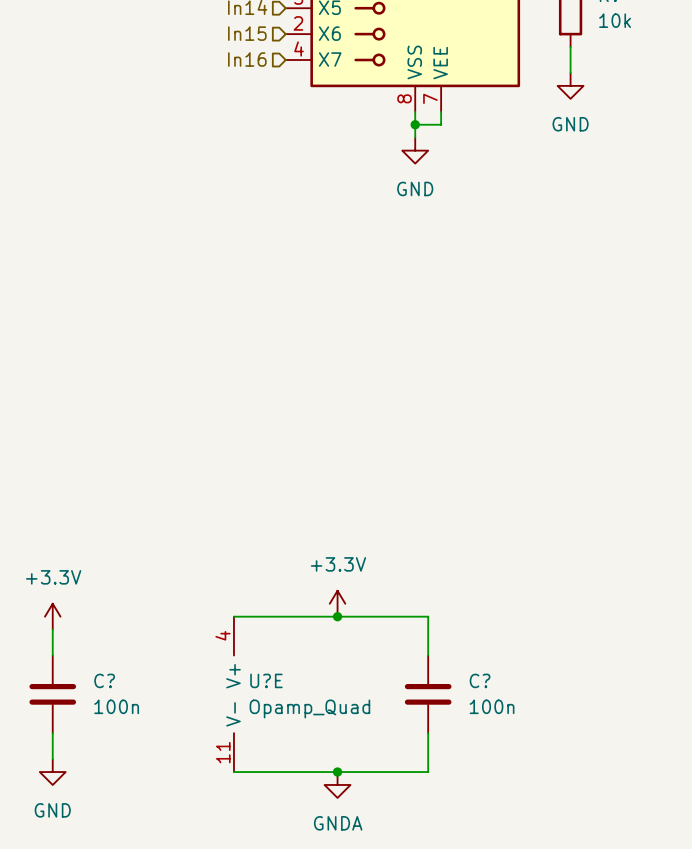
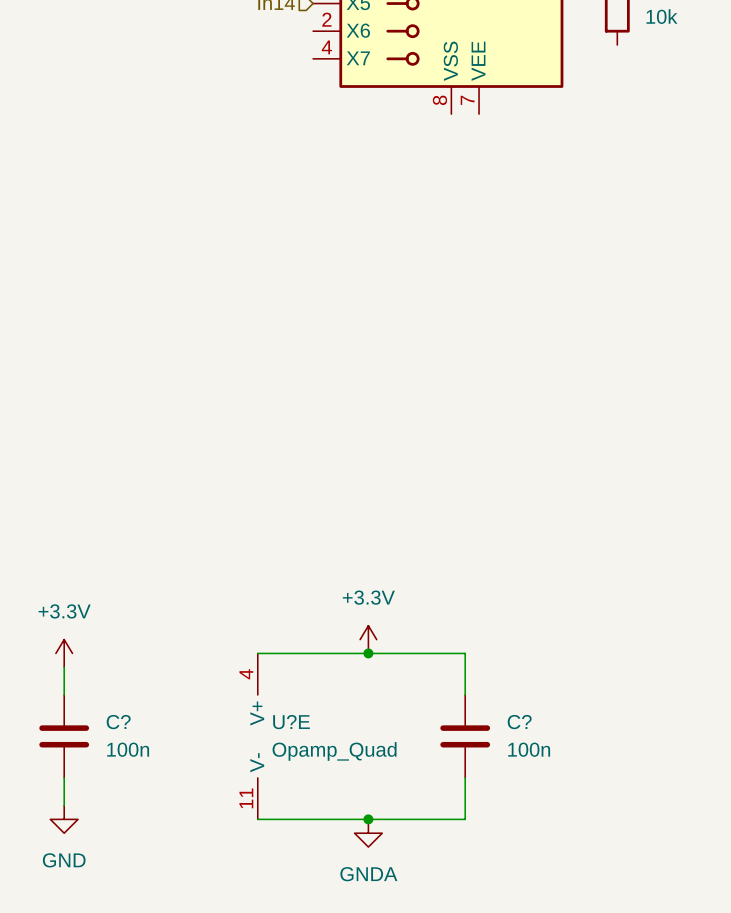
hierarchical label: In15 (247, 33) -> none
wire: (570, 47) (570, 72) -> none
hierarchical label: In16 (247, 59) -> none
power symbol: GND (570, 85) -> none
wire: (415, 111) (415, 137) -> none
wire: (441, 111) (441, 124) (415, 124) -> none
junction: (415, 124) -> none
power symbol: GND (415, 150) -> none

